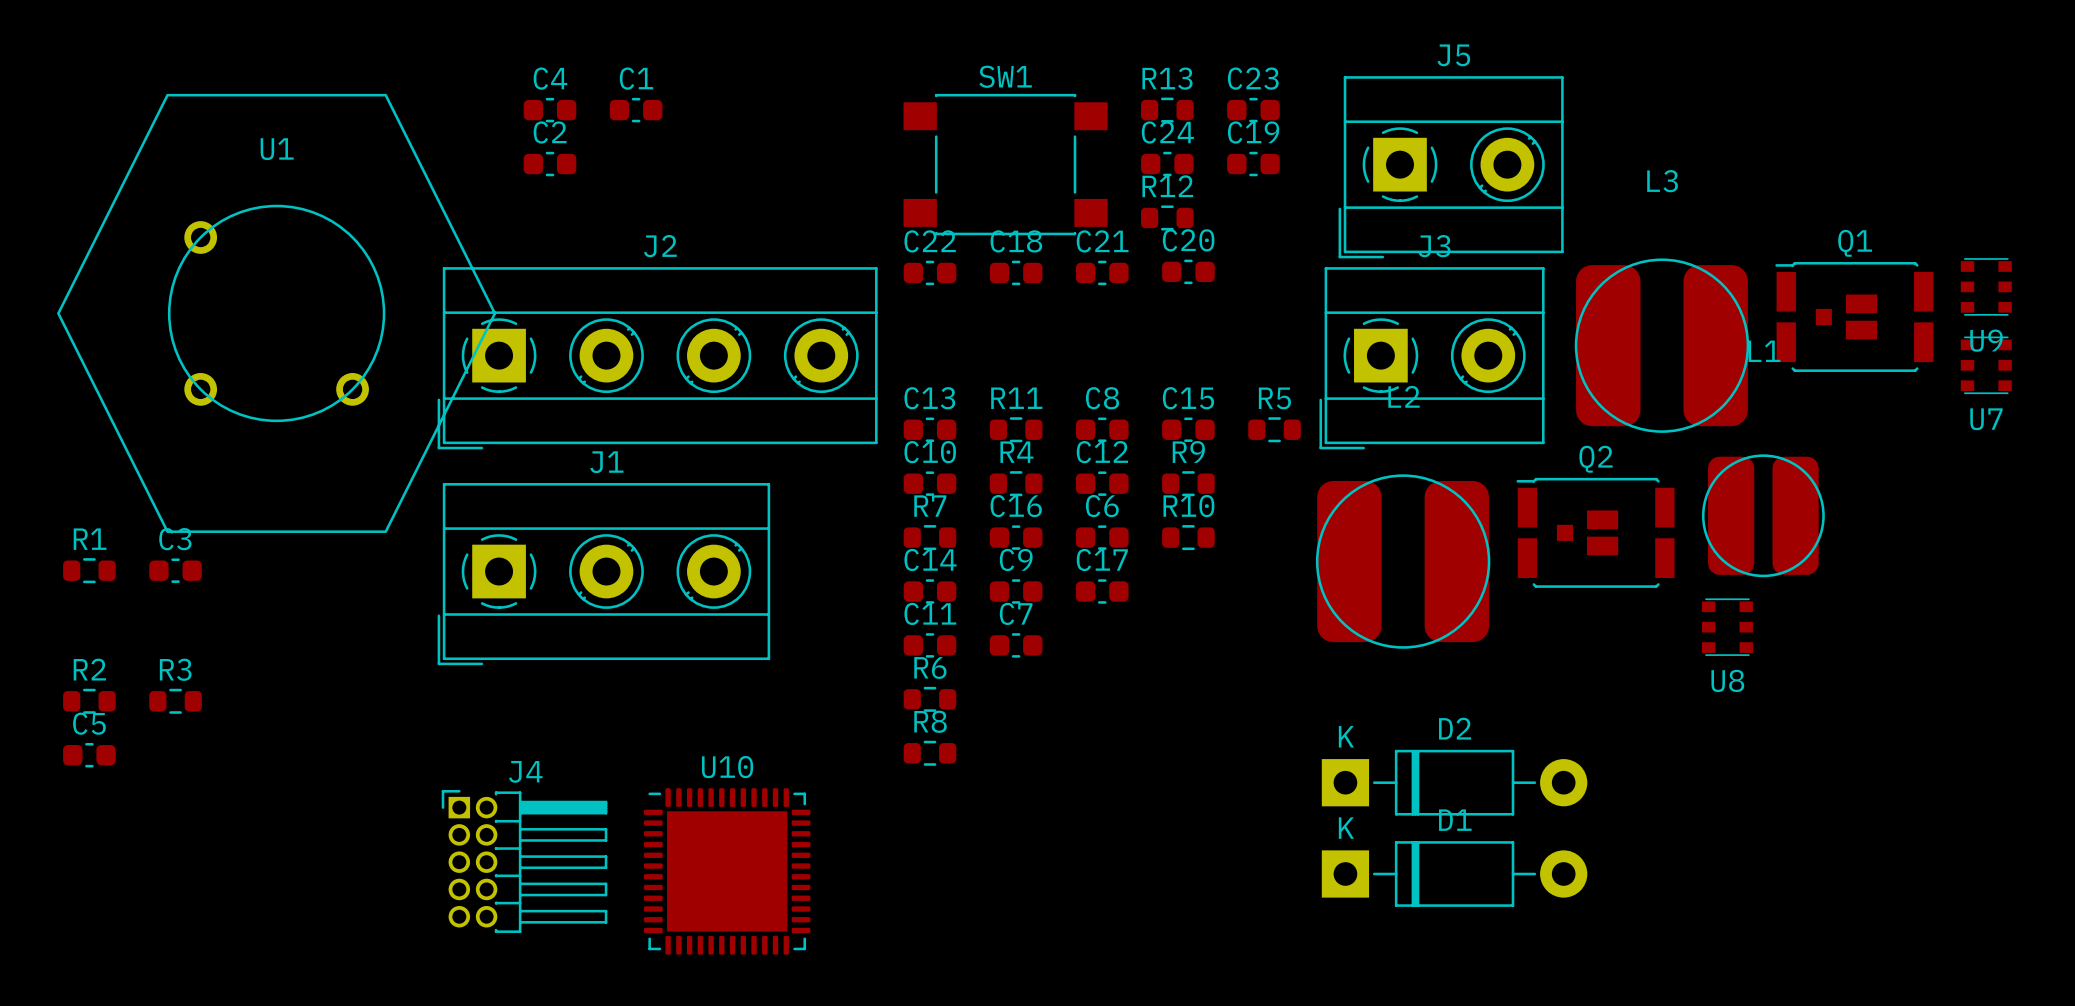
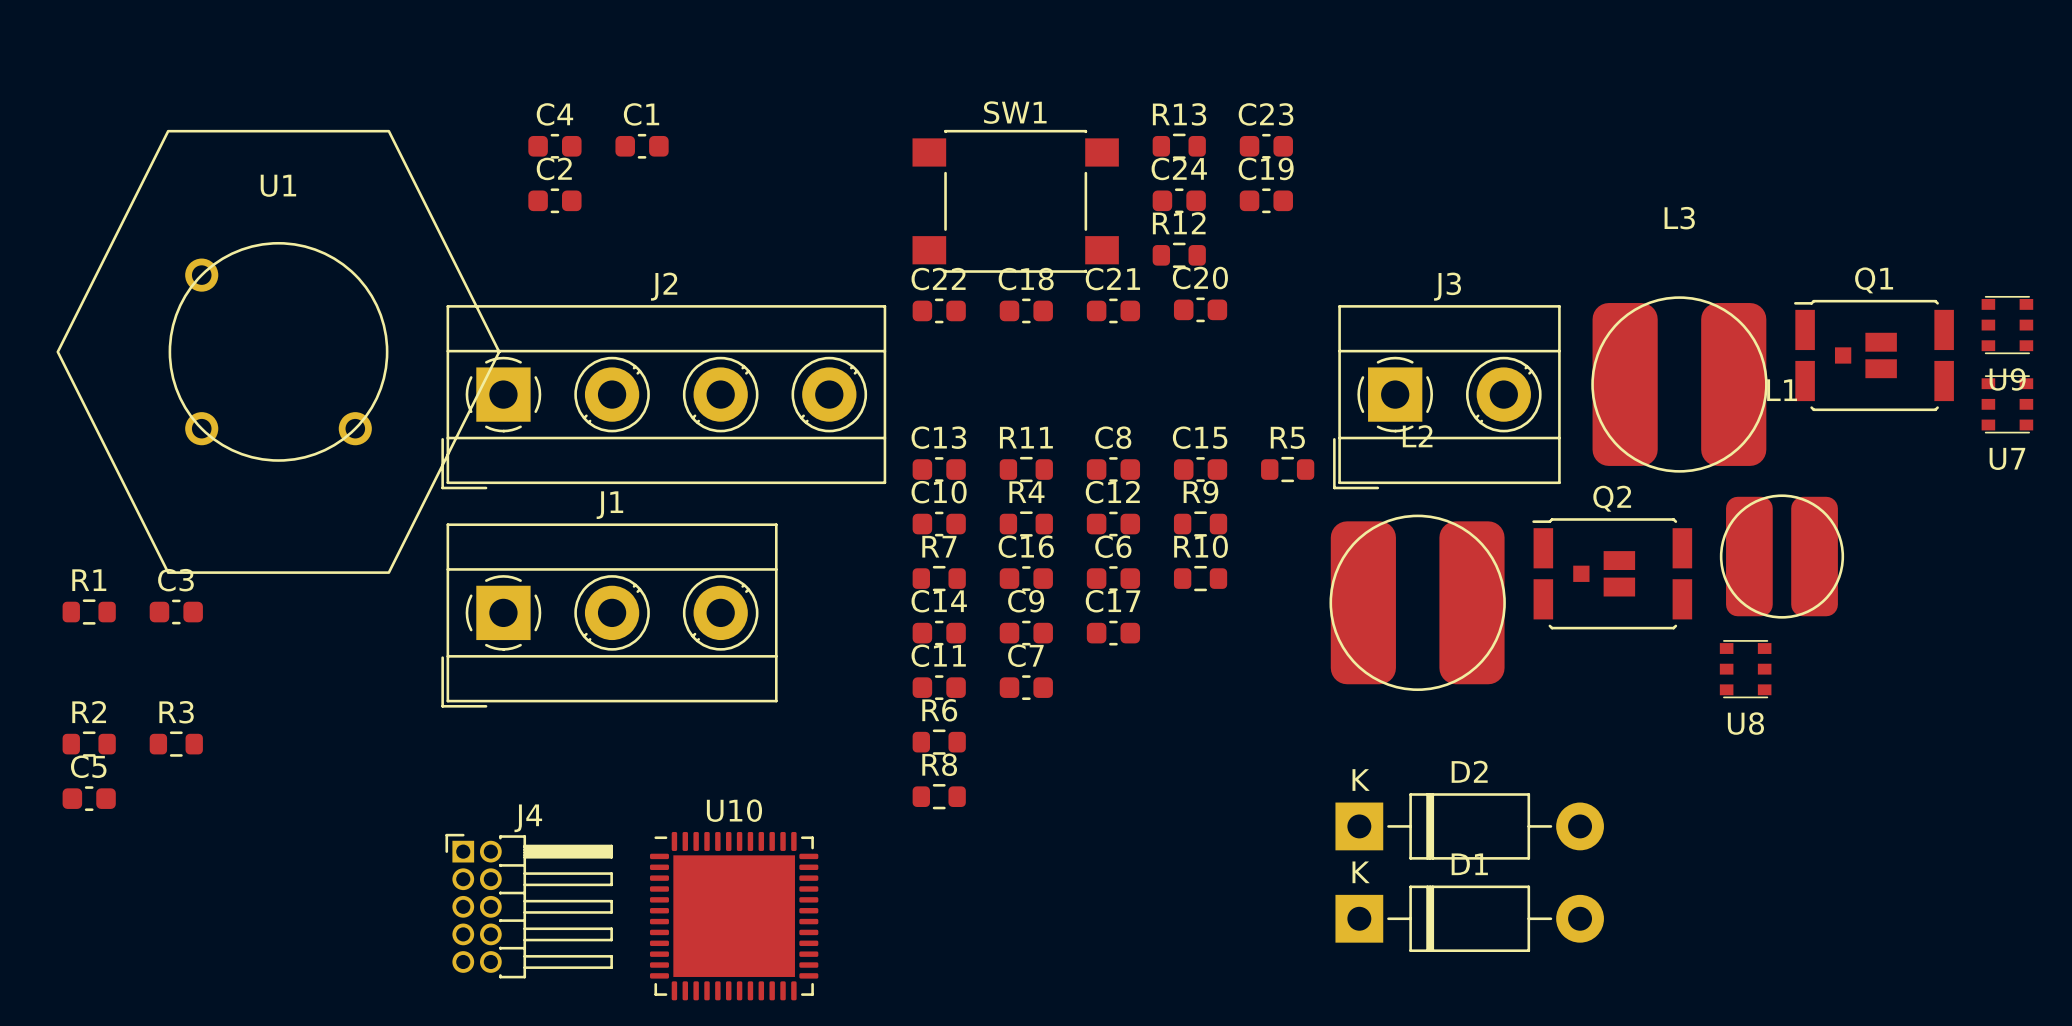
J5: (1451, 167) -> none

